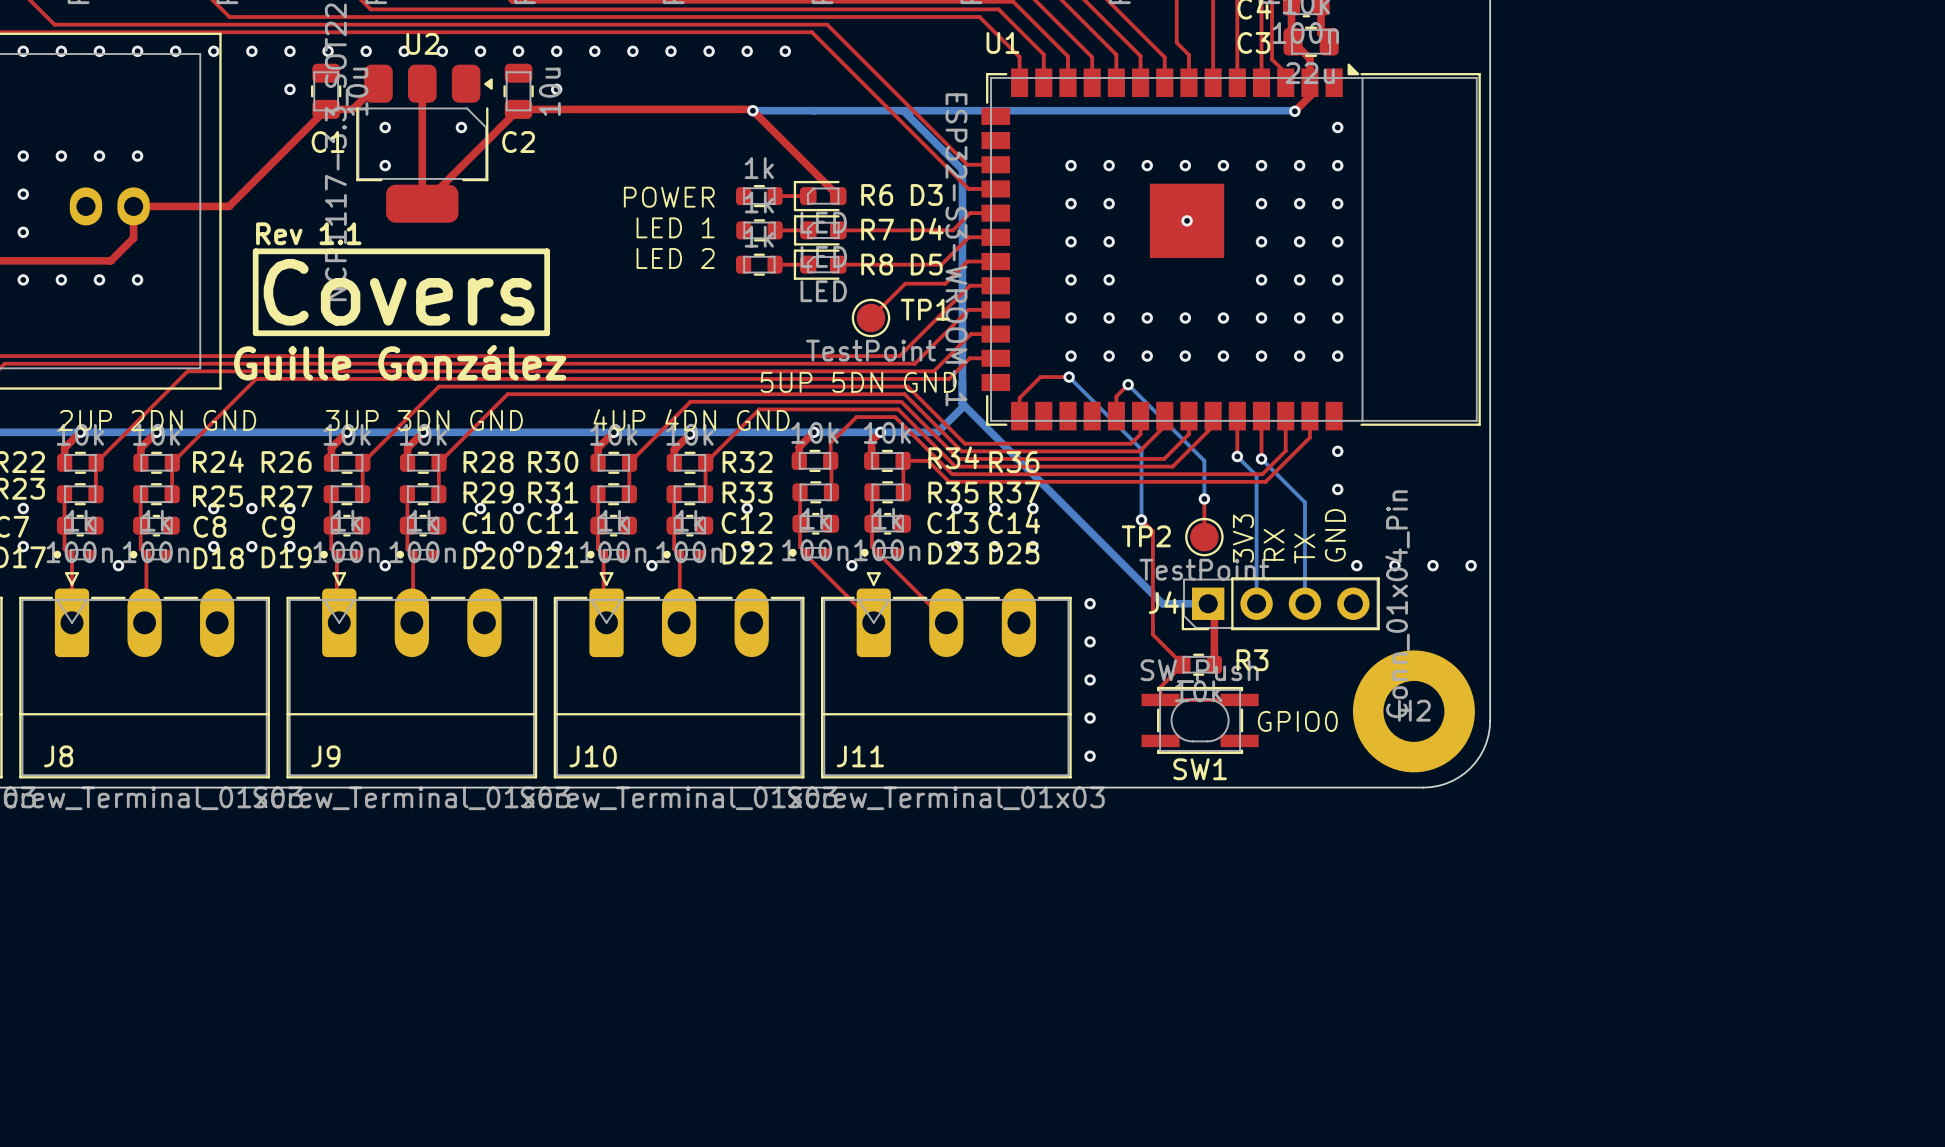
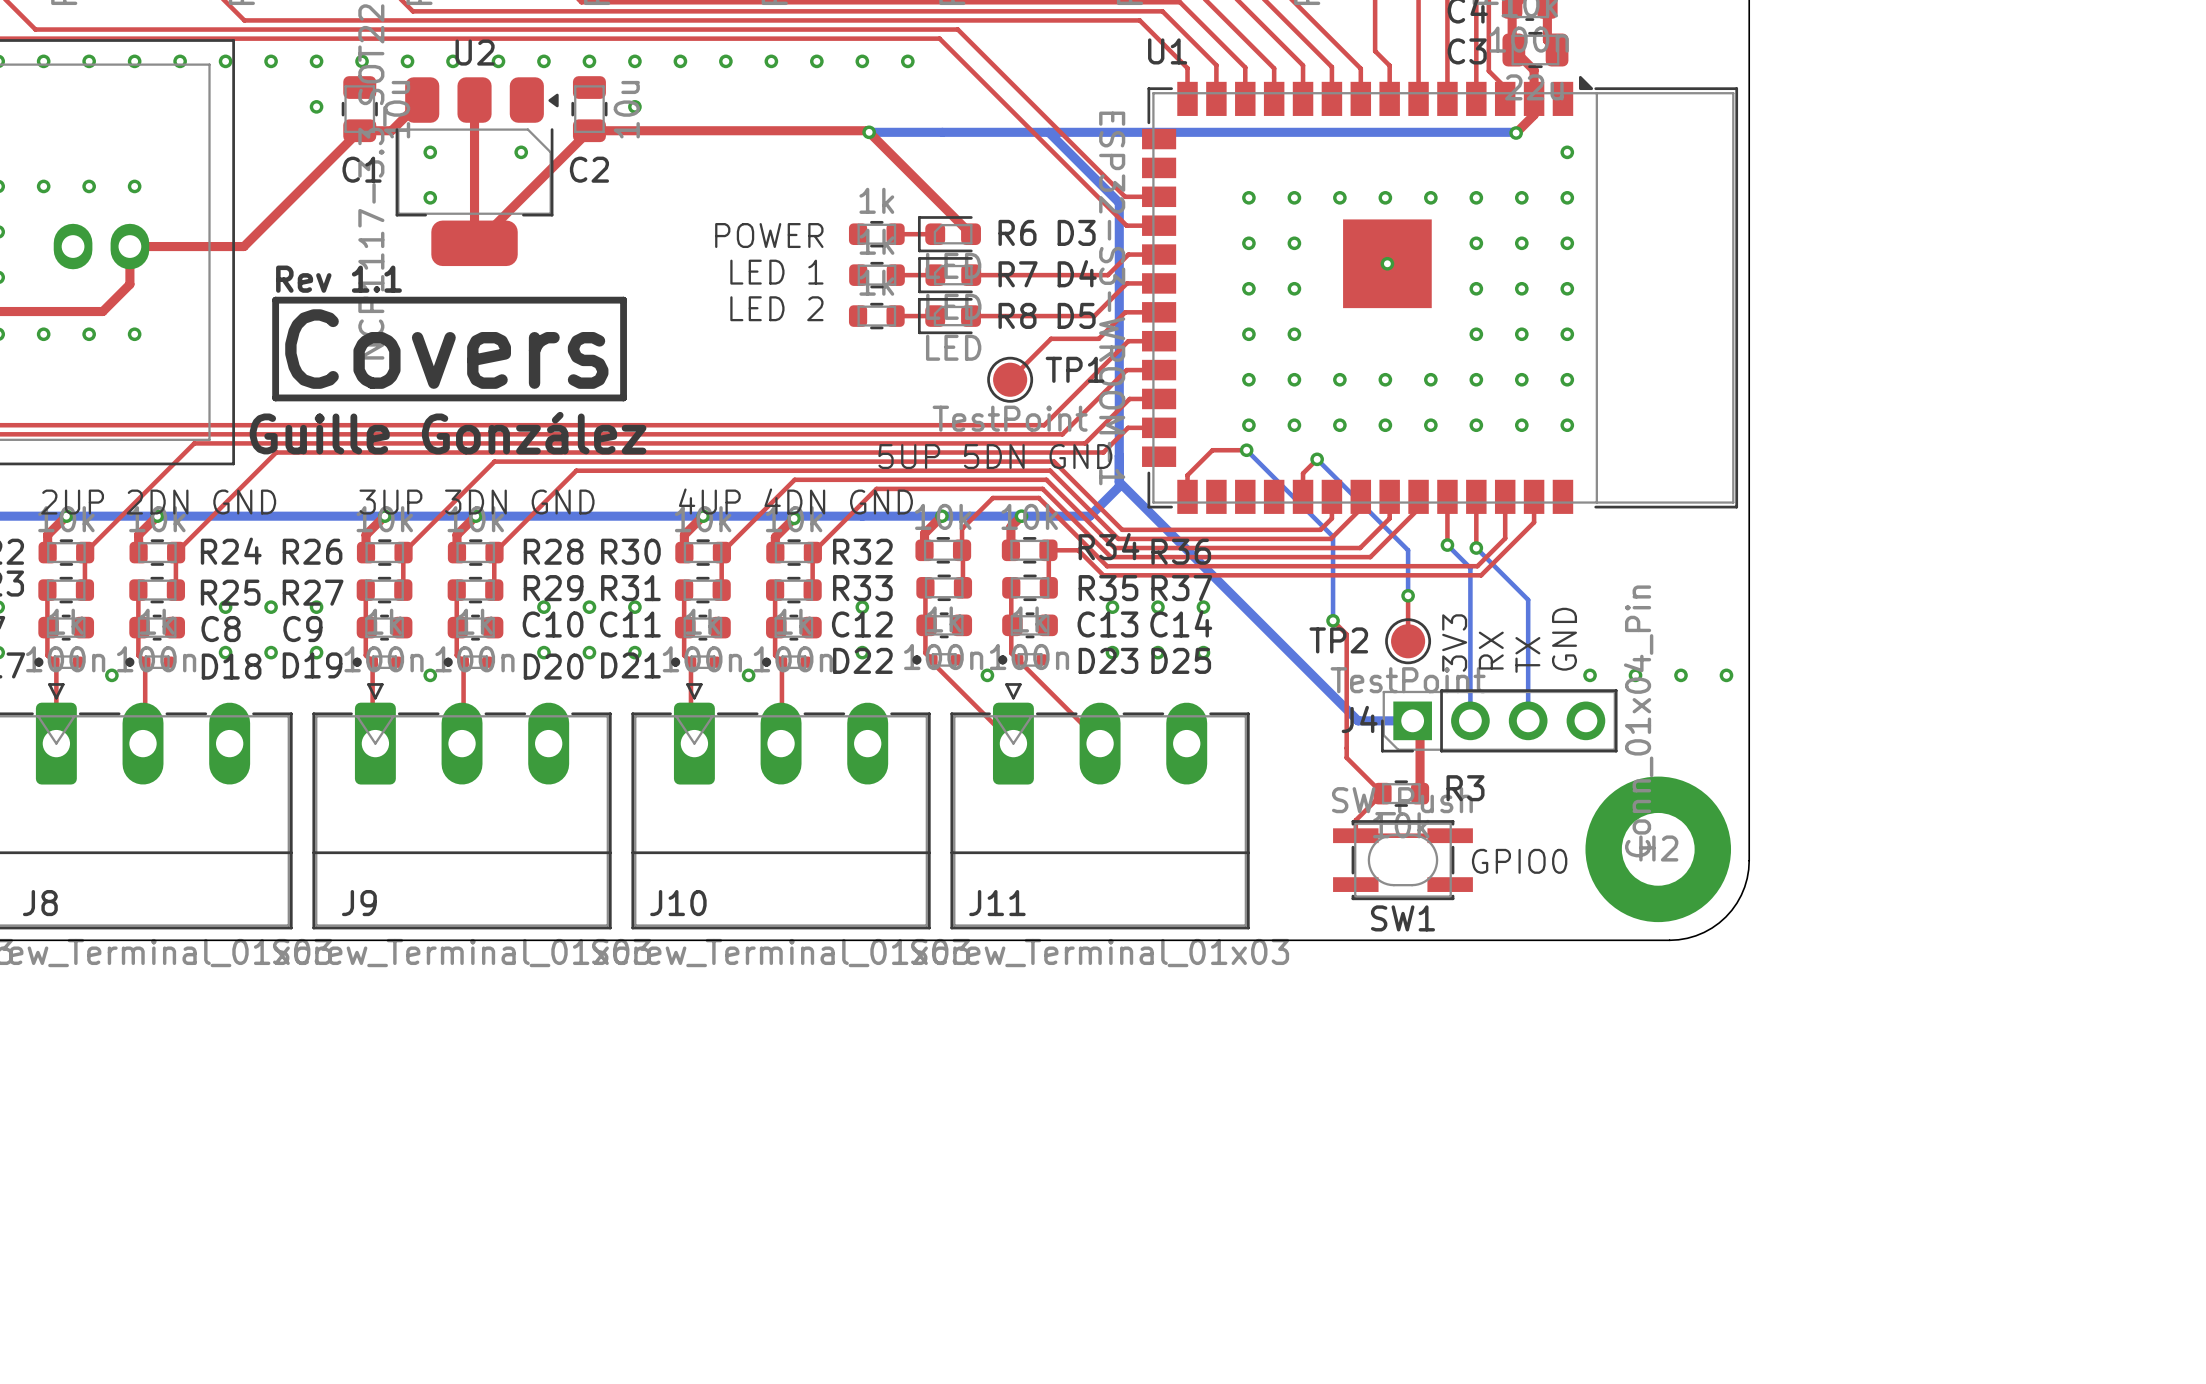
via: (1337, 451) -> none
via: (1337, 489) -> none
via: (1090, 603) -> none
via: (1090, 641) -> none
via: (1090, 679) -> none
via: (1090, 718) -> none
via: (1090, 756) -> none

